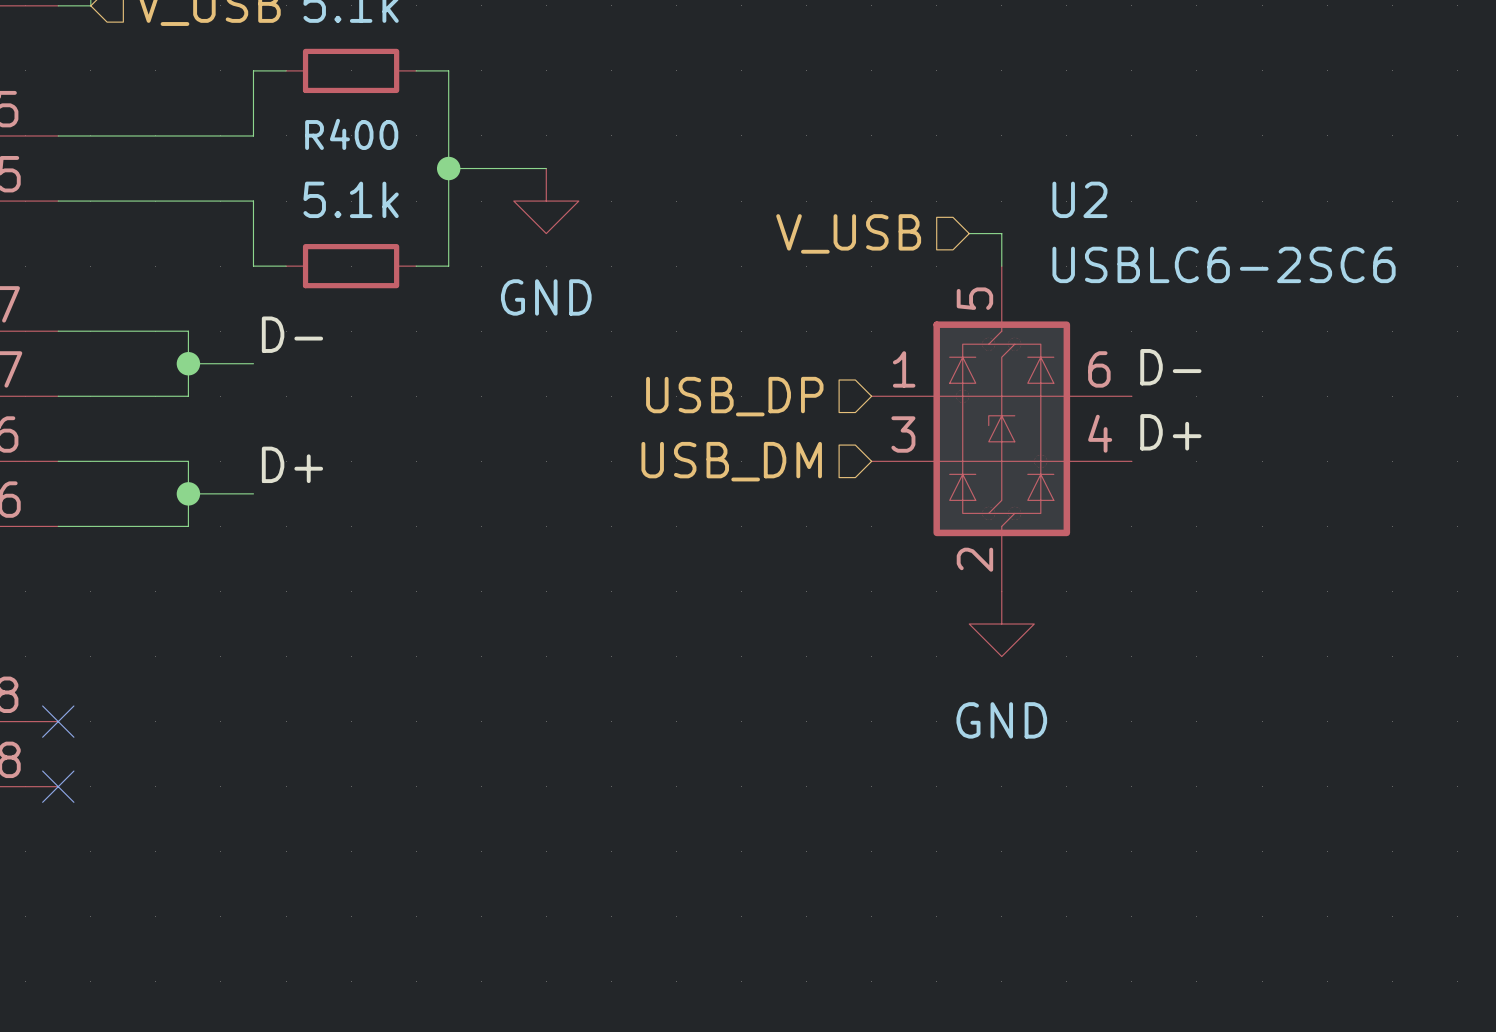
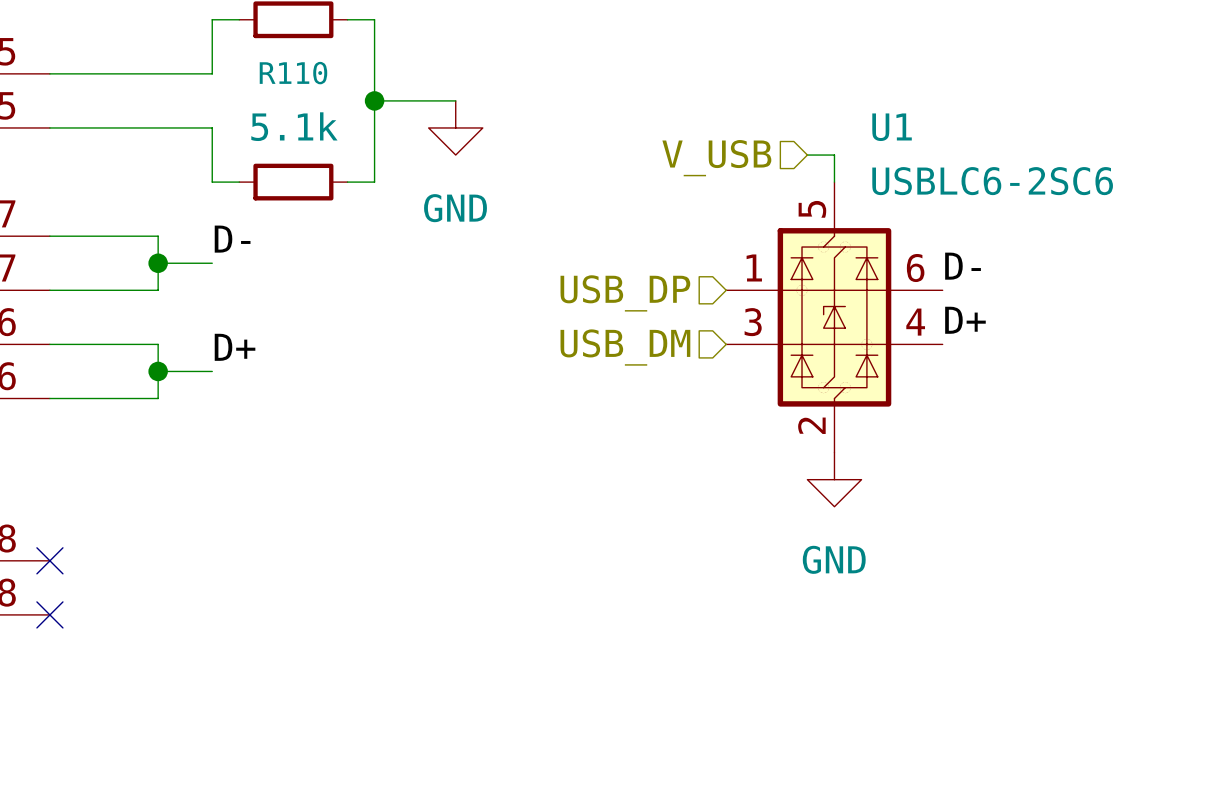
R400 name: R400 (351, 134) -> R110 (293, 73)
U2 name: U2 (1079, 199) -> U1 (892, 127)

